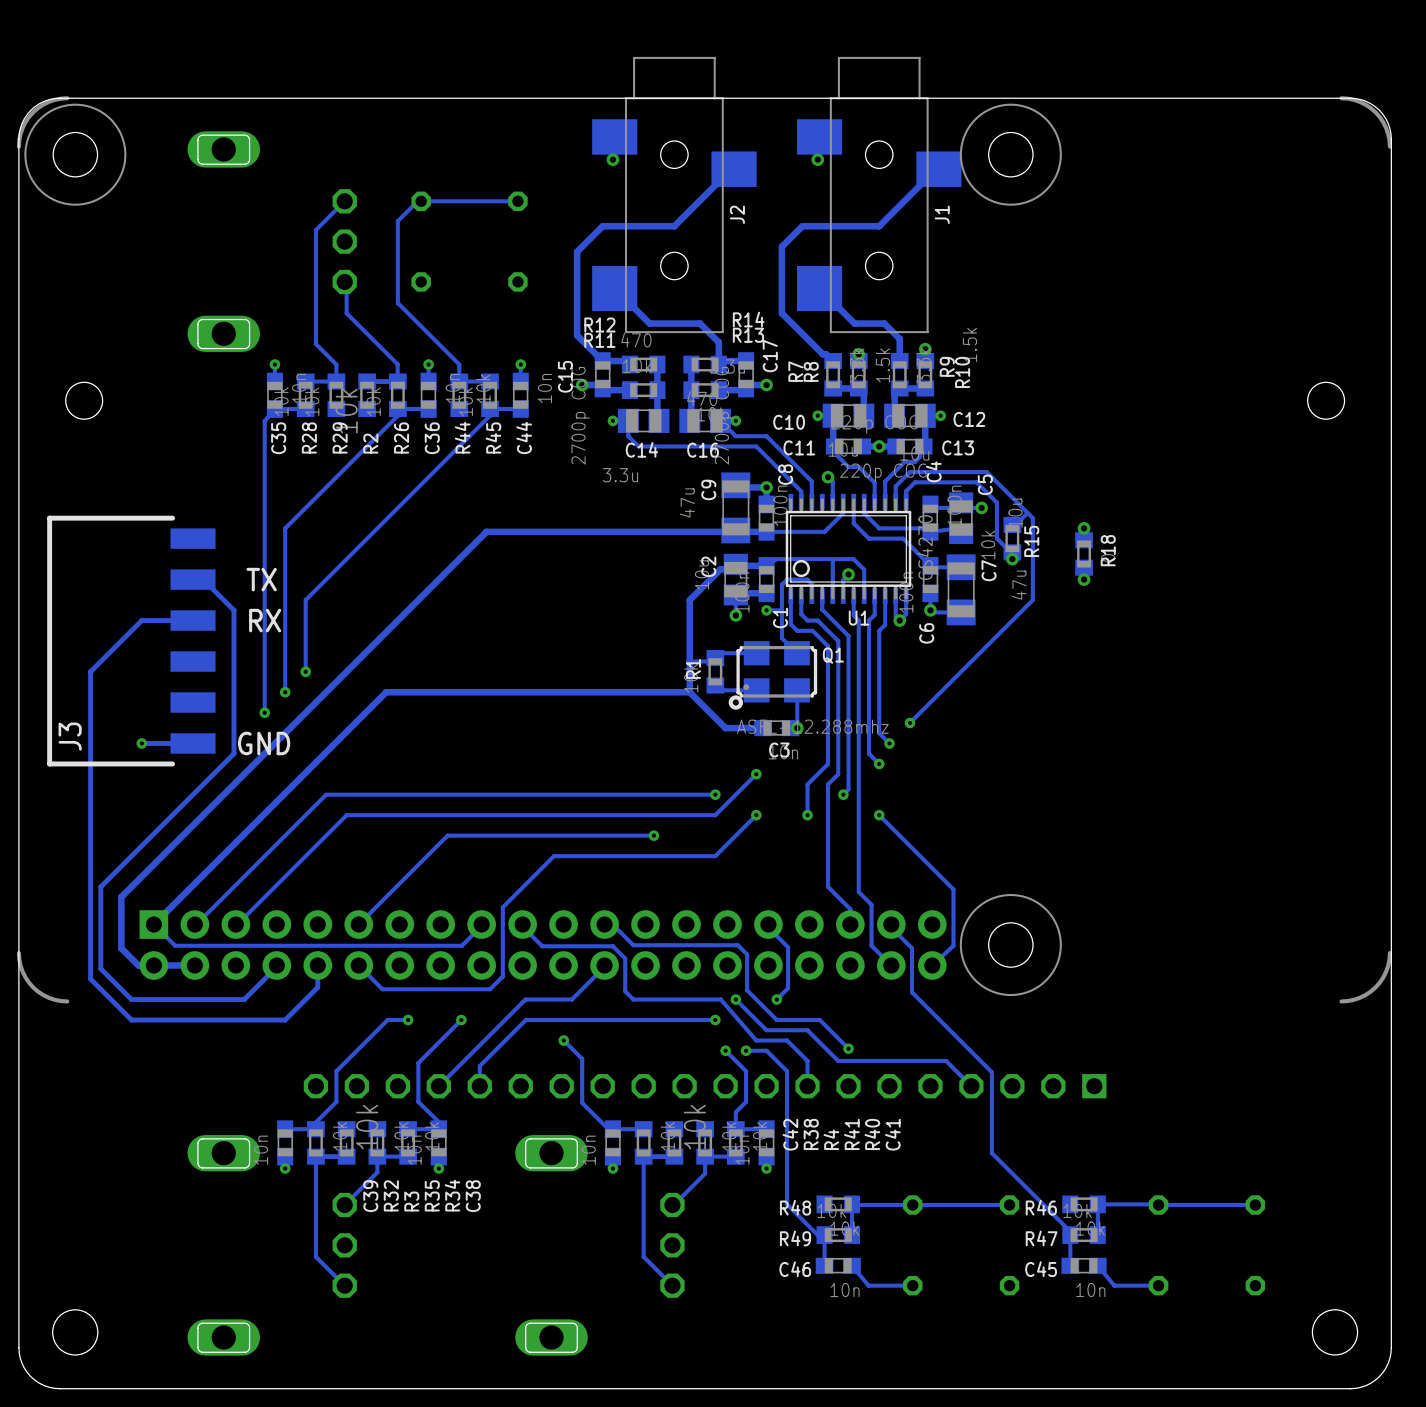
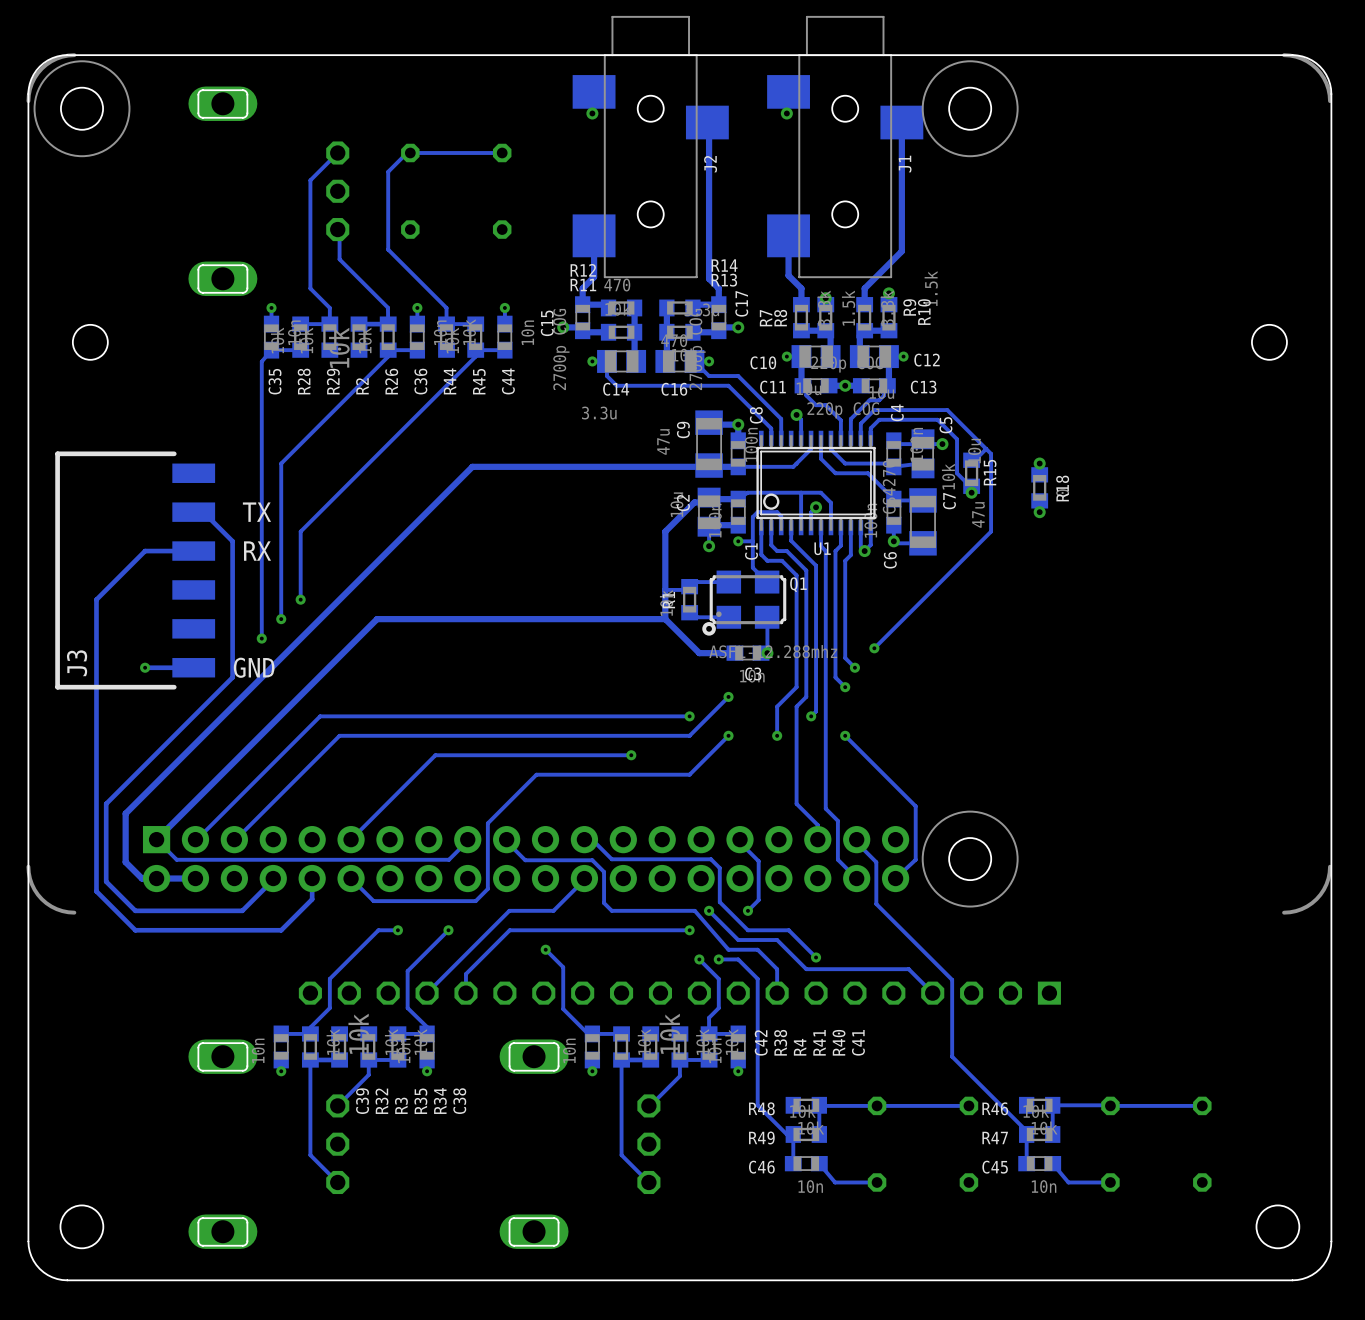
track: (734, 169) (731, 169) (674, 226) (602, 226) (577, 251) (577, 335) (602, 361) -> (707, 122) (709, 124) (709, 278) (718, 288) (718, 304)
track: (938, 169) (936, 169) (879, 226) (802, 226) (781, 246) (781, 313) (822, 354) (826, 354) (833, 361) -> (901, 122) (901, 251) (864, 288)
track: (614, 288) (649, 323) (700, 323) (718, 342) (718, 364) -> (594, 235) (594, 277) (582, 288) (582, 304)
track: (819, 288) (854, 323) (884, 323) (899, 338) (899, 344) -> (788, 235) (788, 275) (801, 288) (801, 304)

